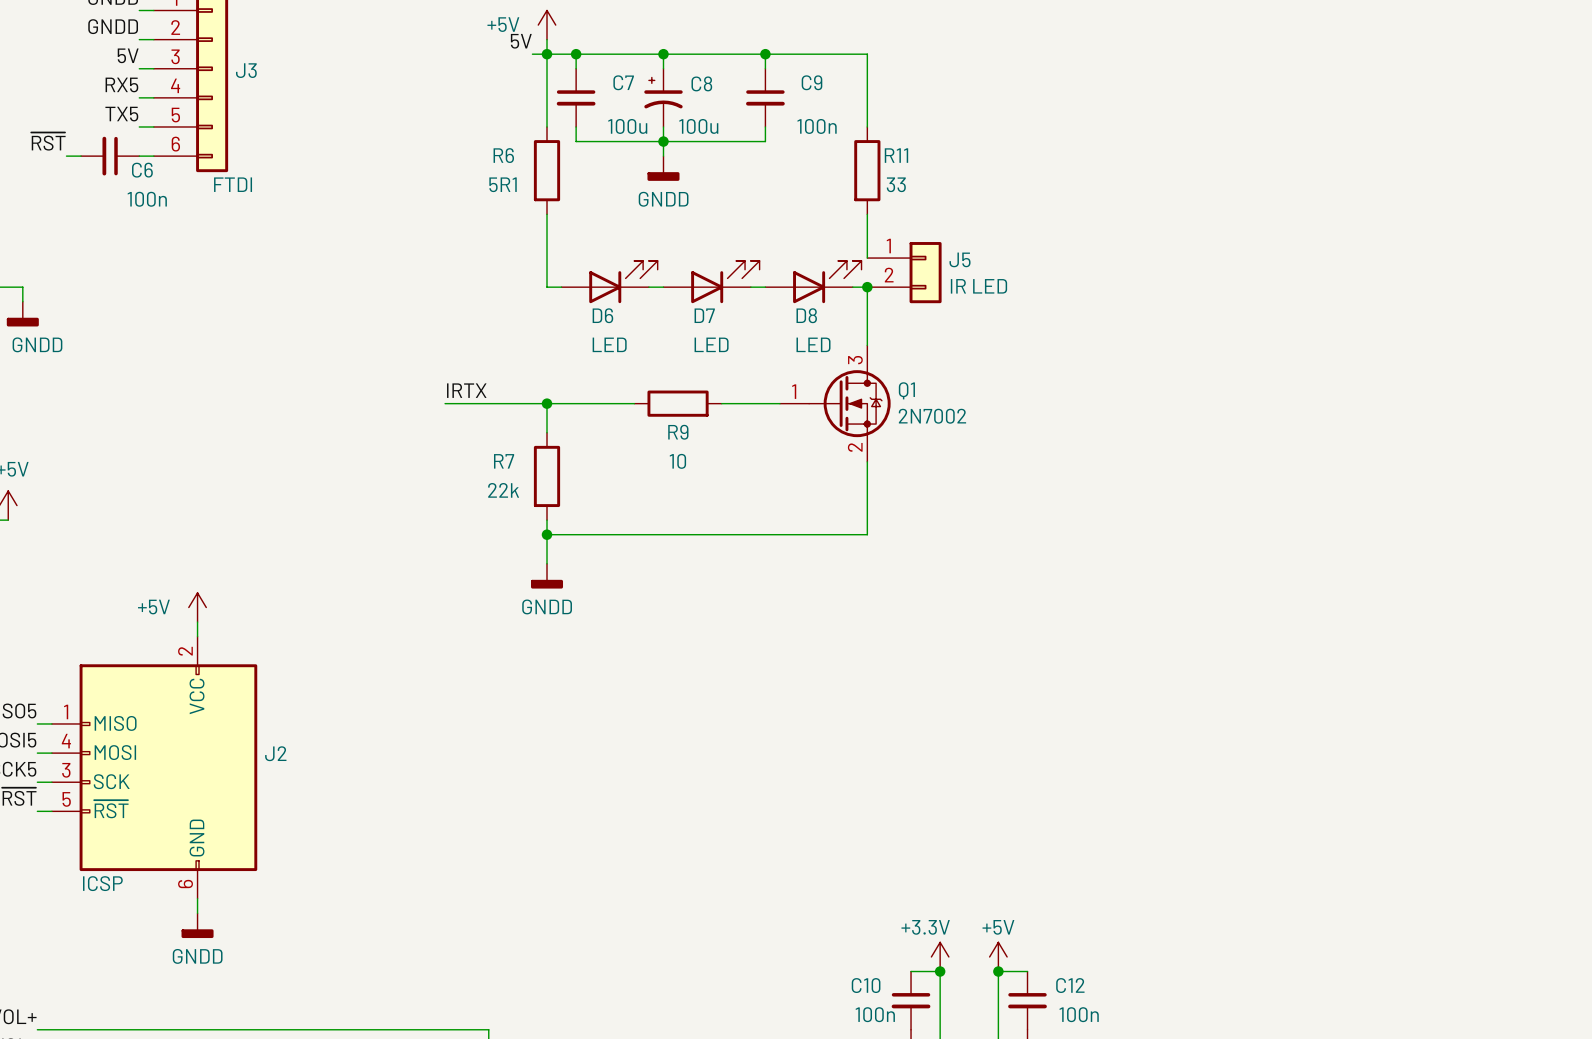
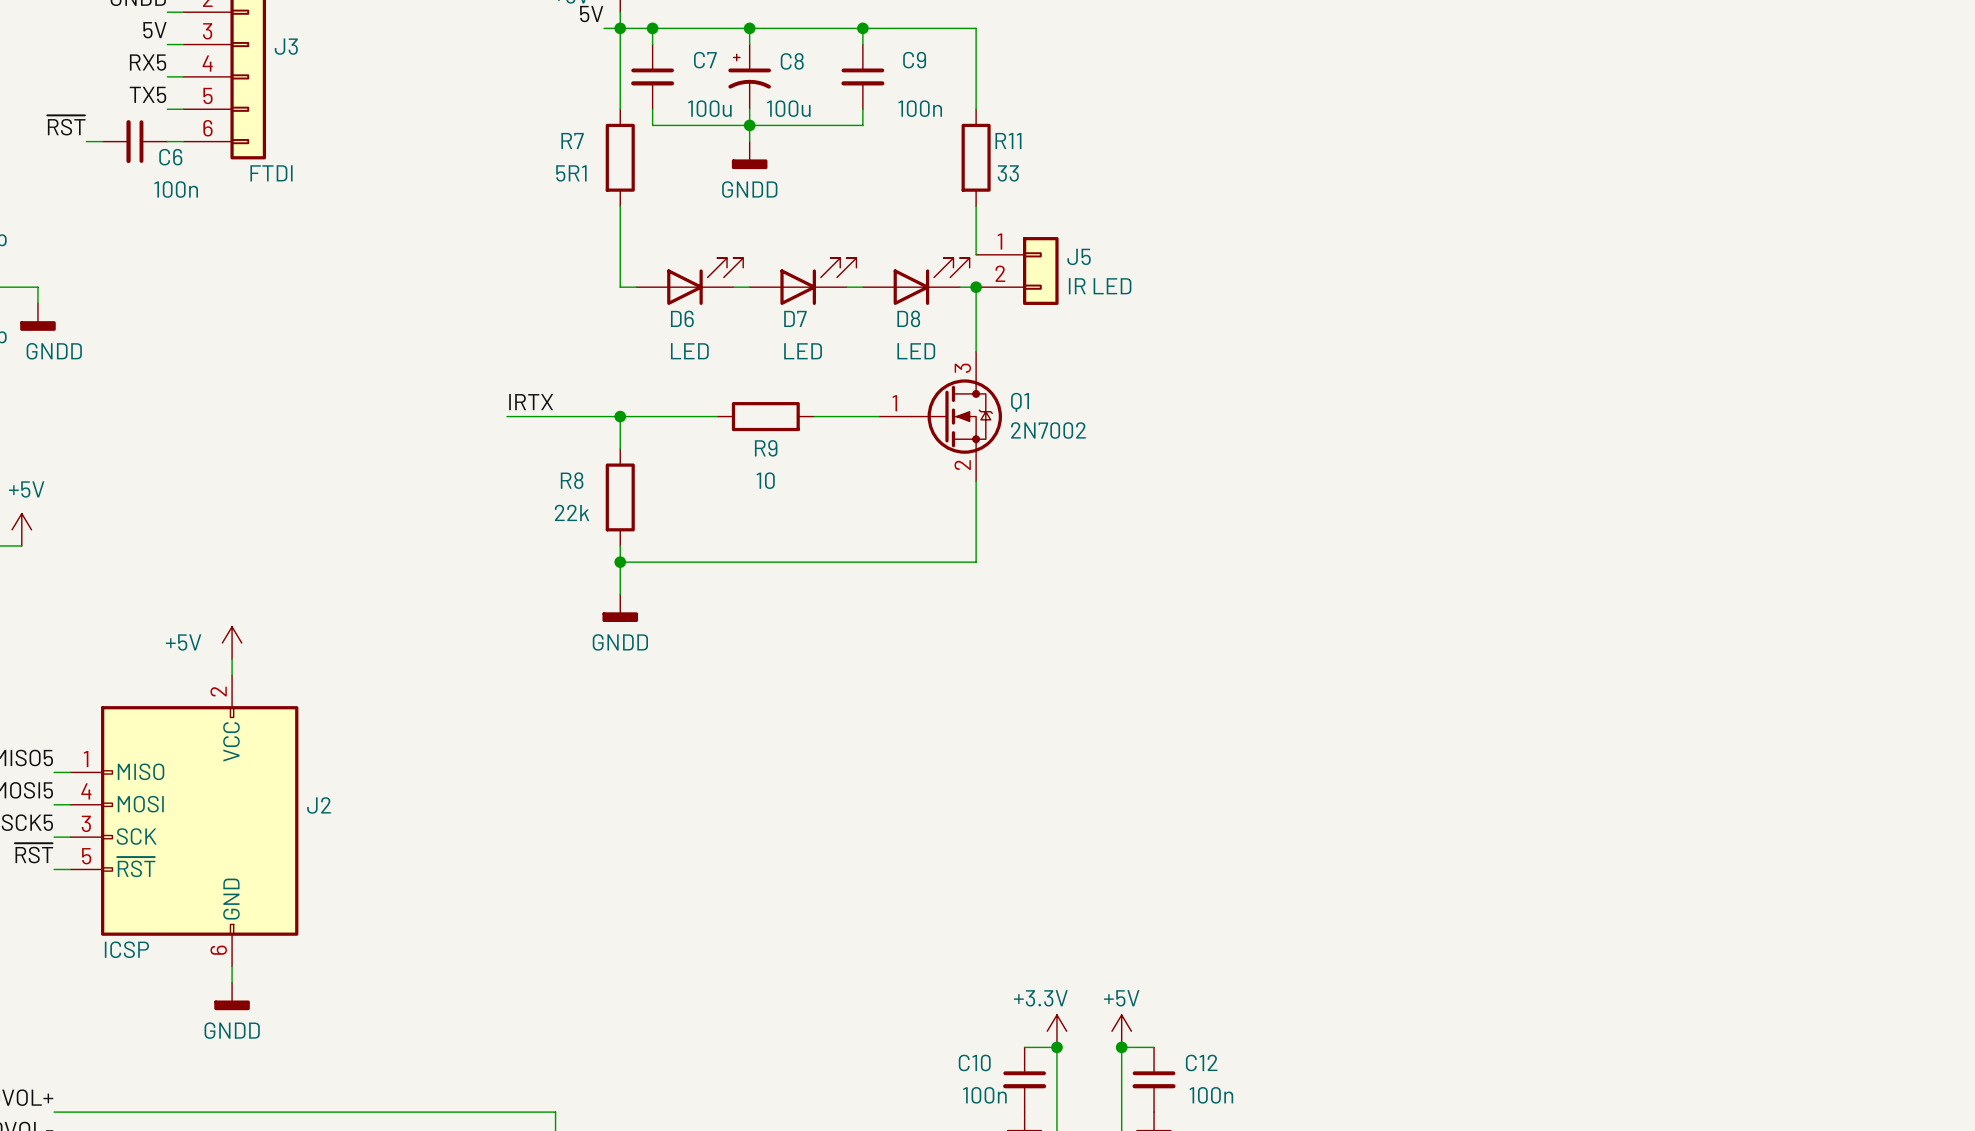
R6 name: R6 (503, 155) -> R7 (572, 141)
R7 name: R7 (504, 461) -> R8 (572, 480)

